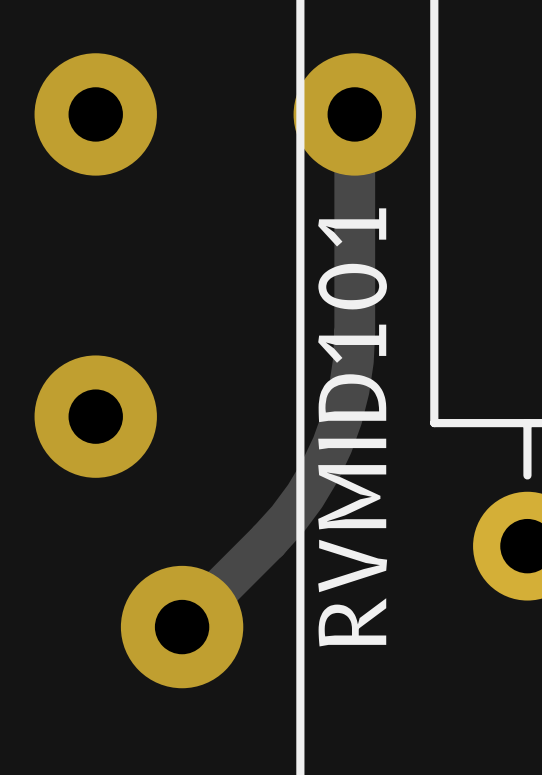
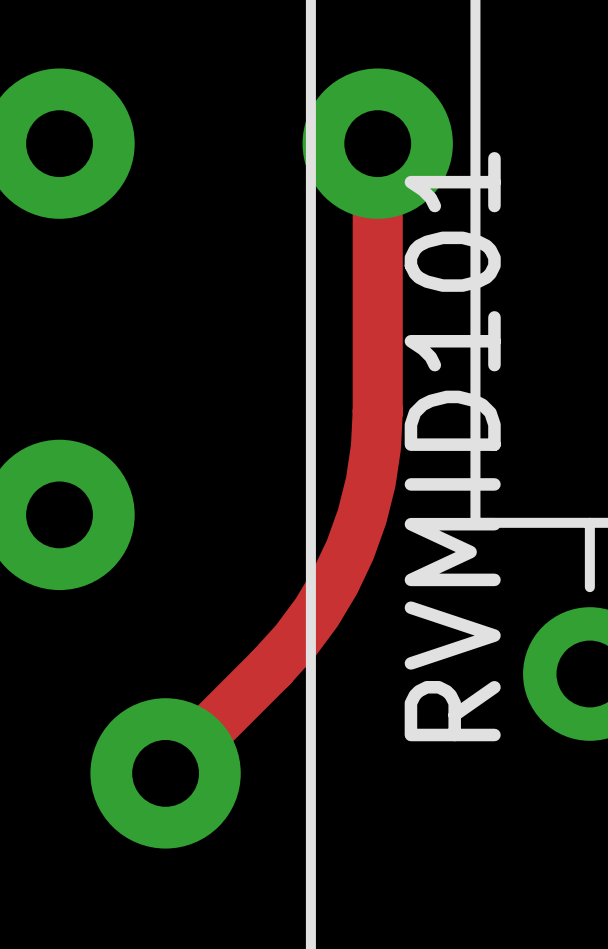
RVMID101 name position: RVMID101 (352, 427) -> RVMID101 (452, 446)

